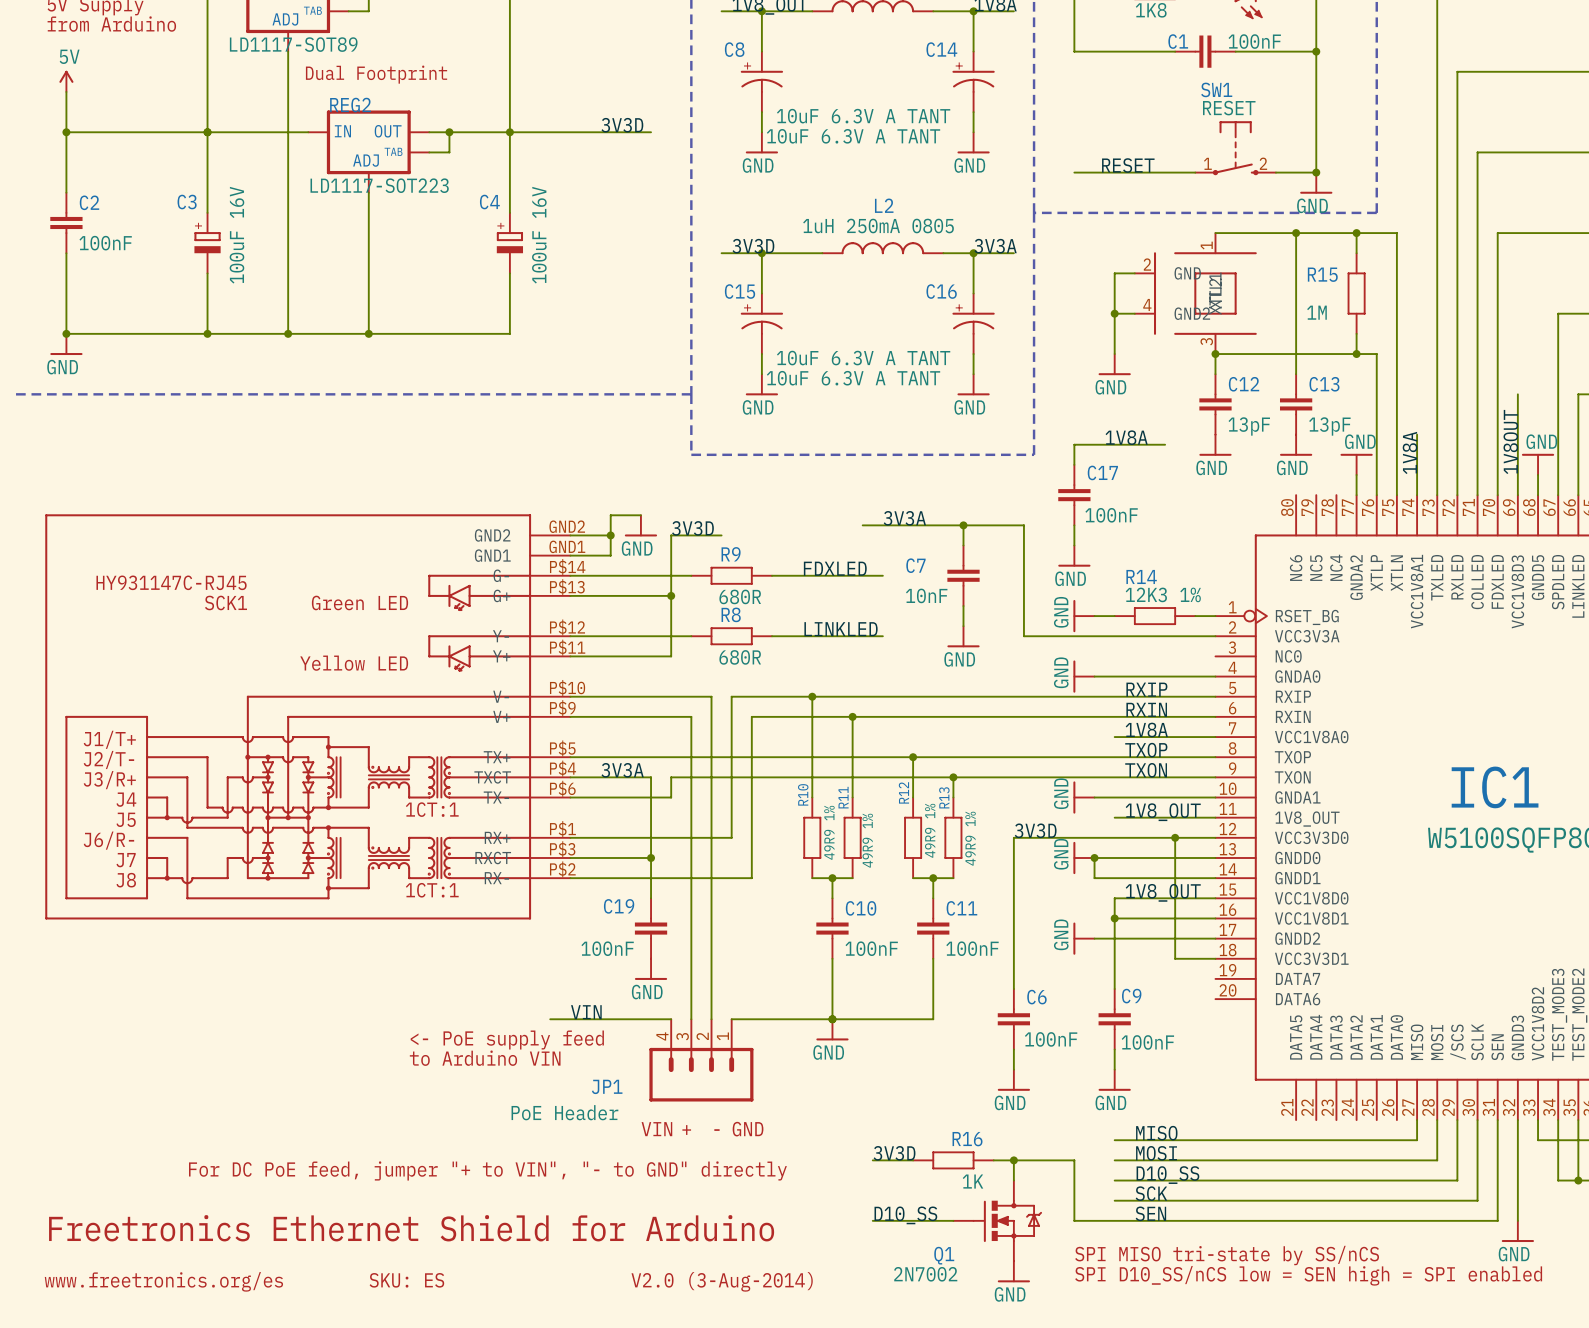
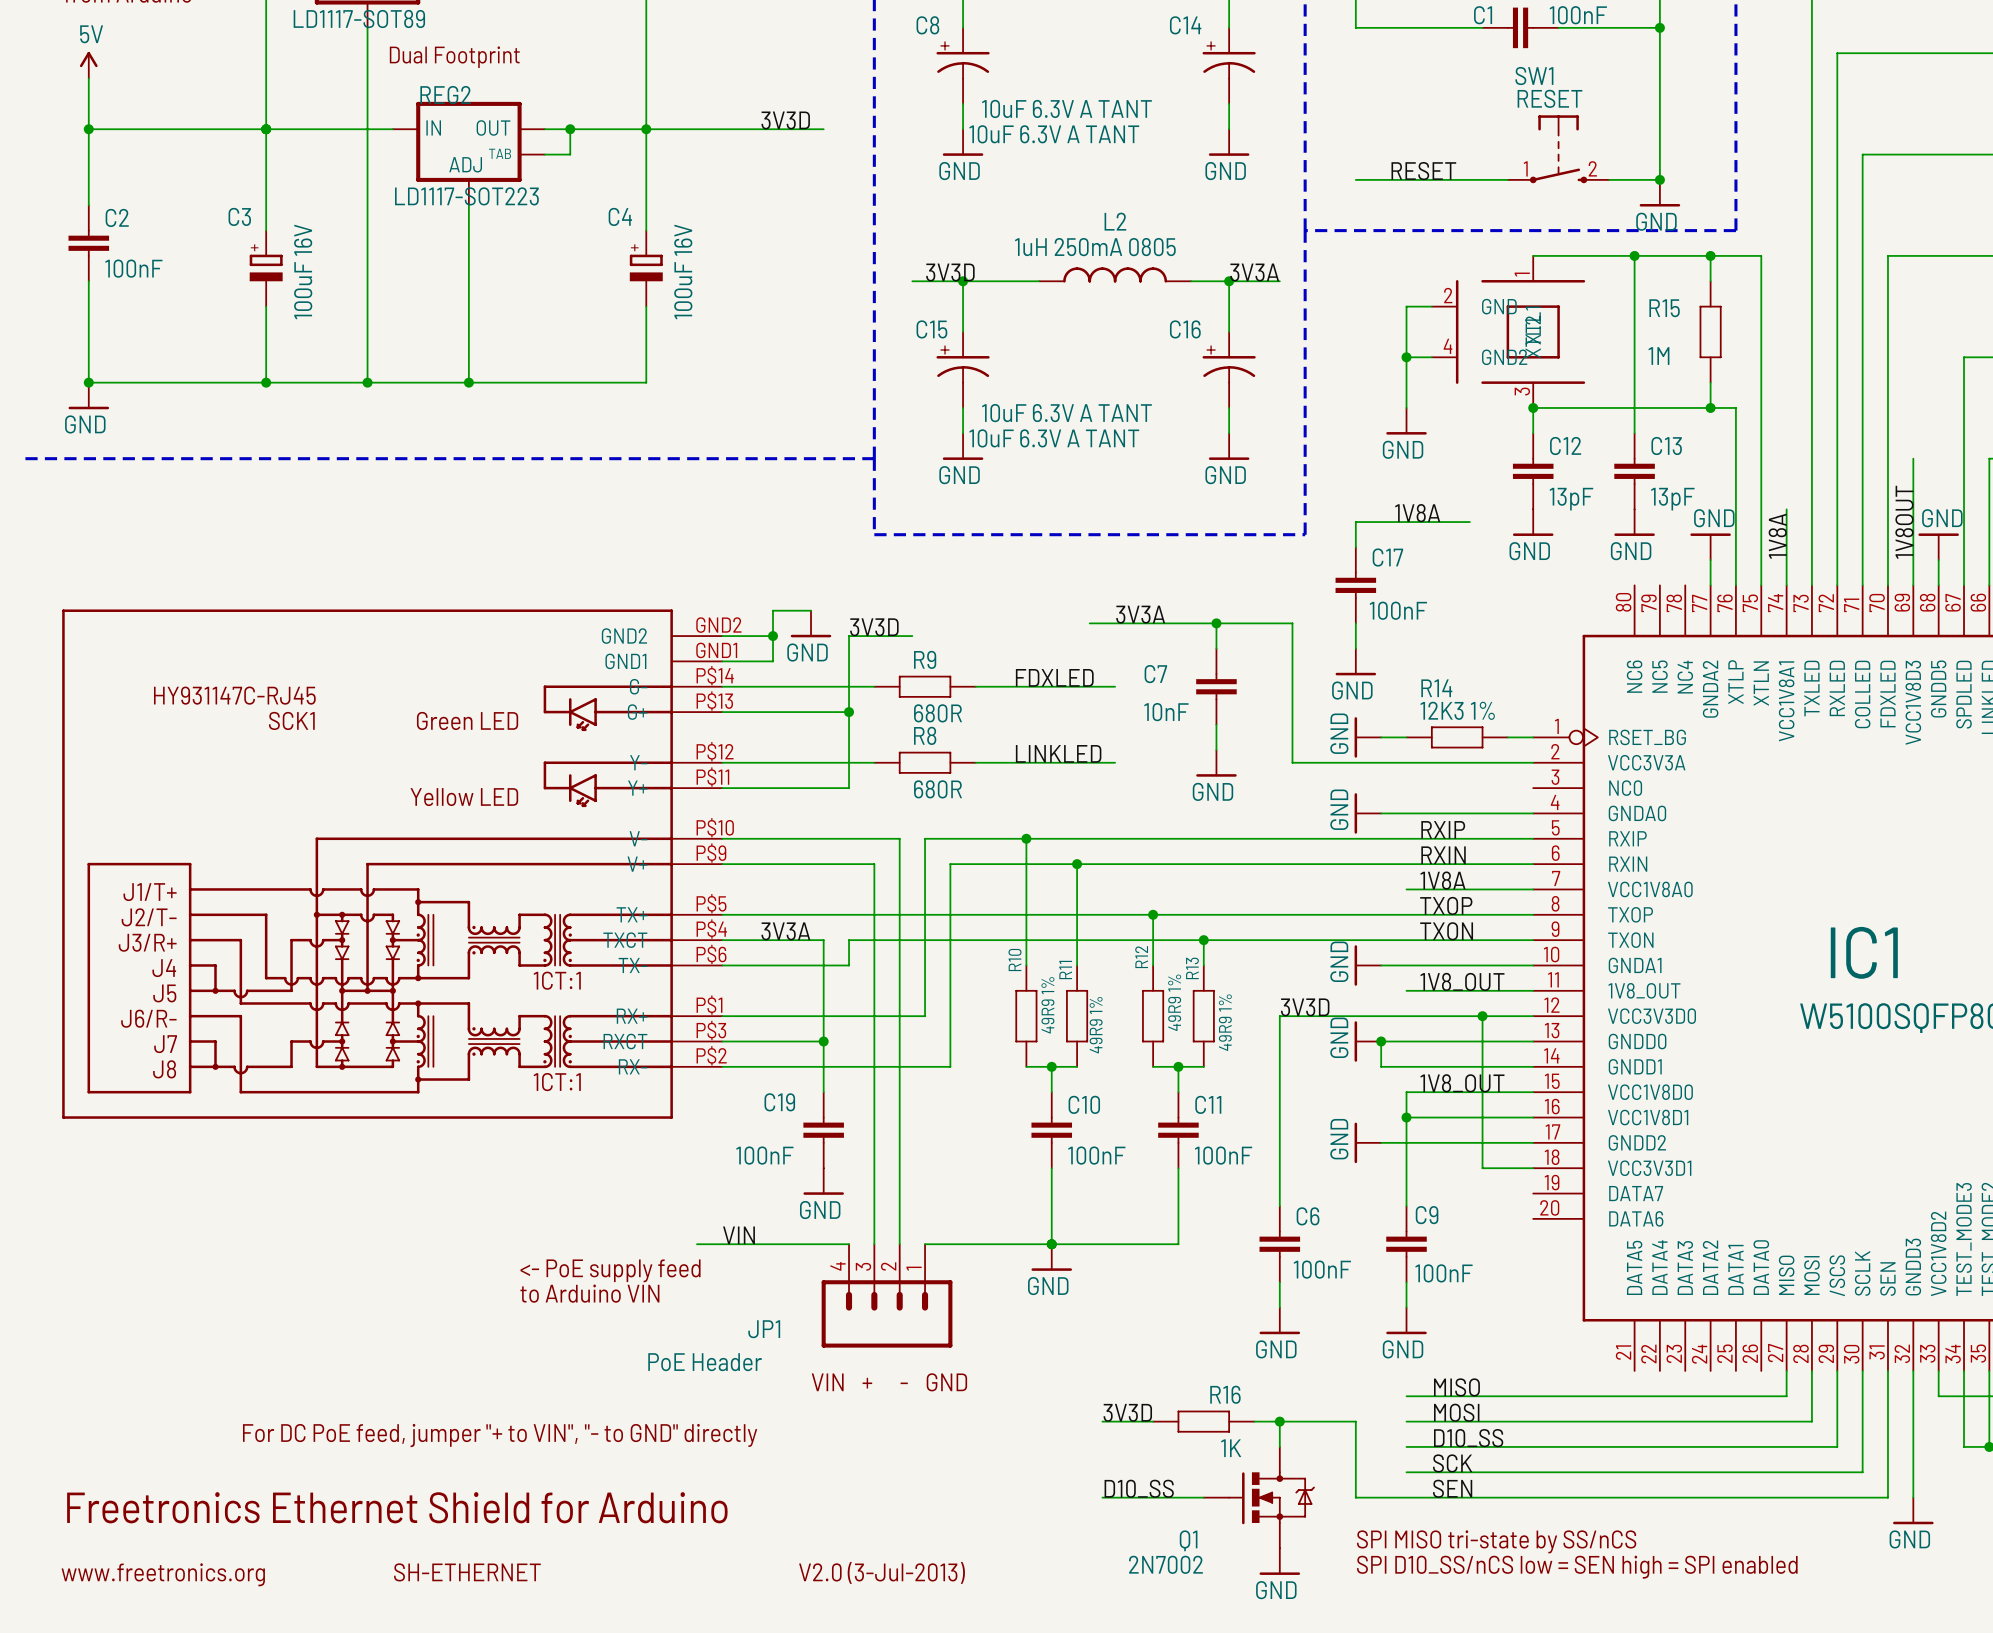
text: none -> SH-ETHERNET (467, 1572)
text: SKU: ES (406, 1280) -> none
text: www.freetronics.org/es (163, 1281) -> www.freetronics.org (163, 1574)
text: V2.0 (3-Aug-2014) (722, 1281) -> V2.0 (3-Jul-2013) (882, 1572)

